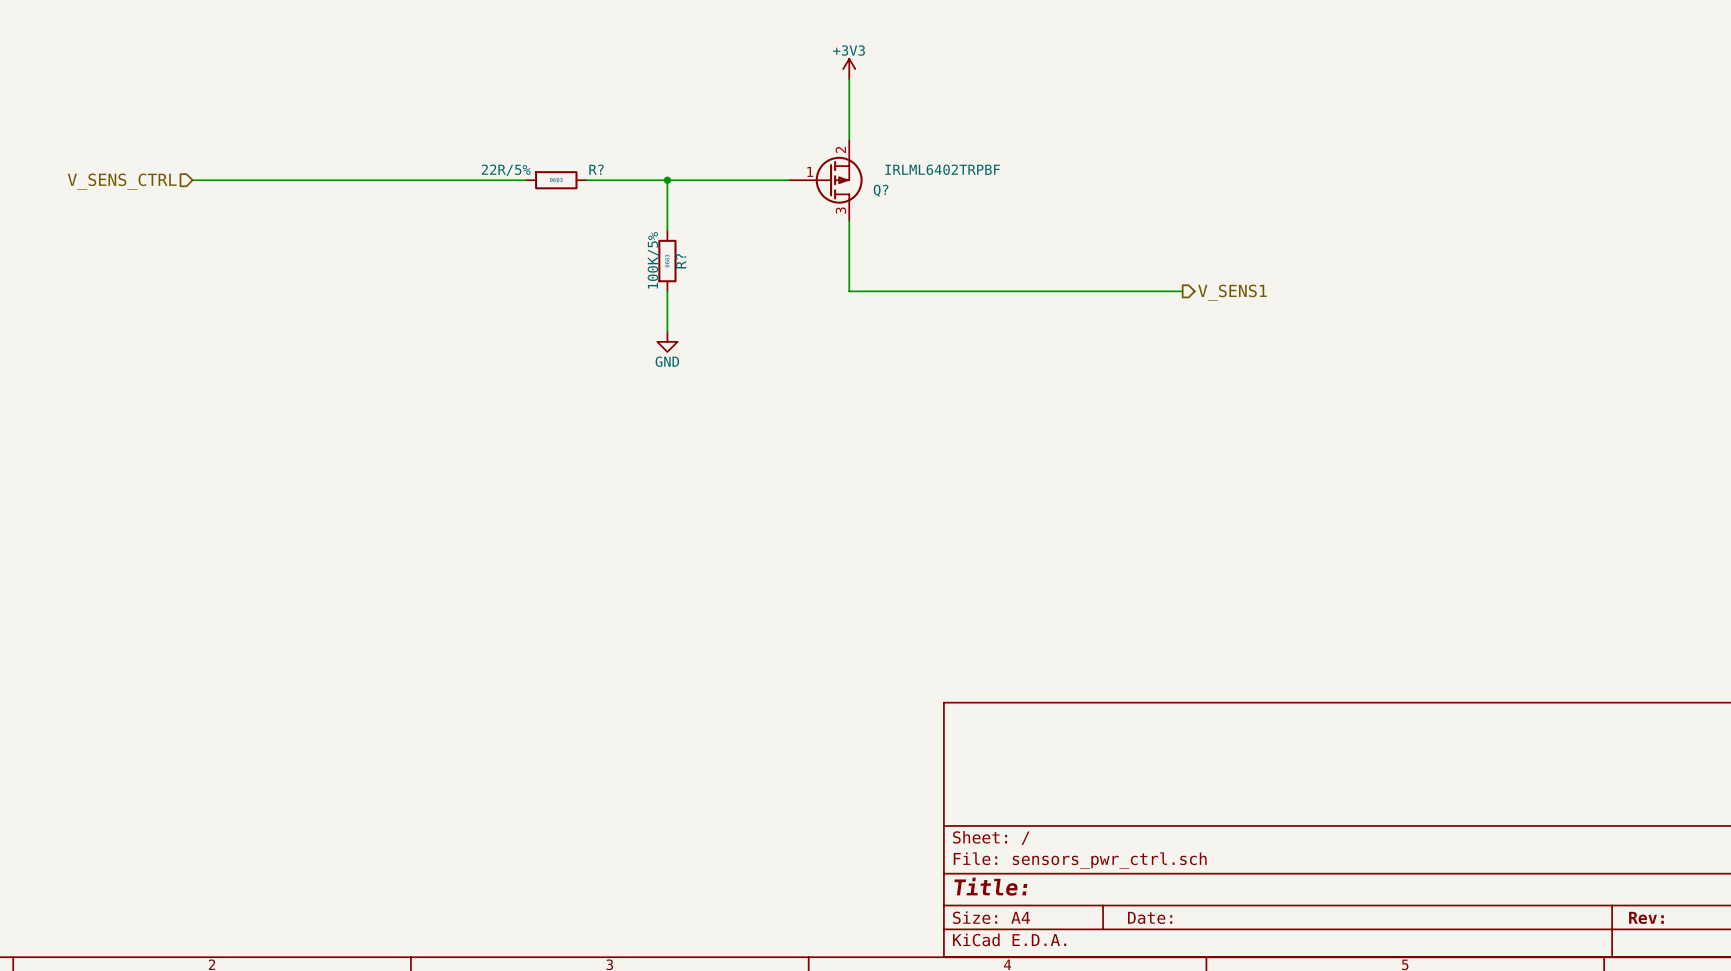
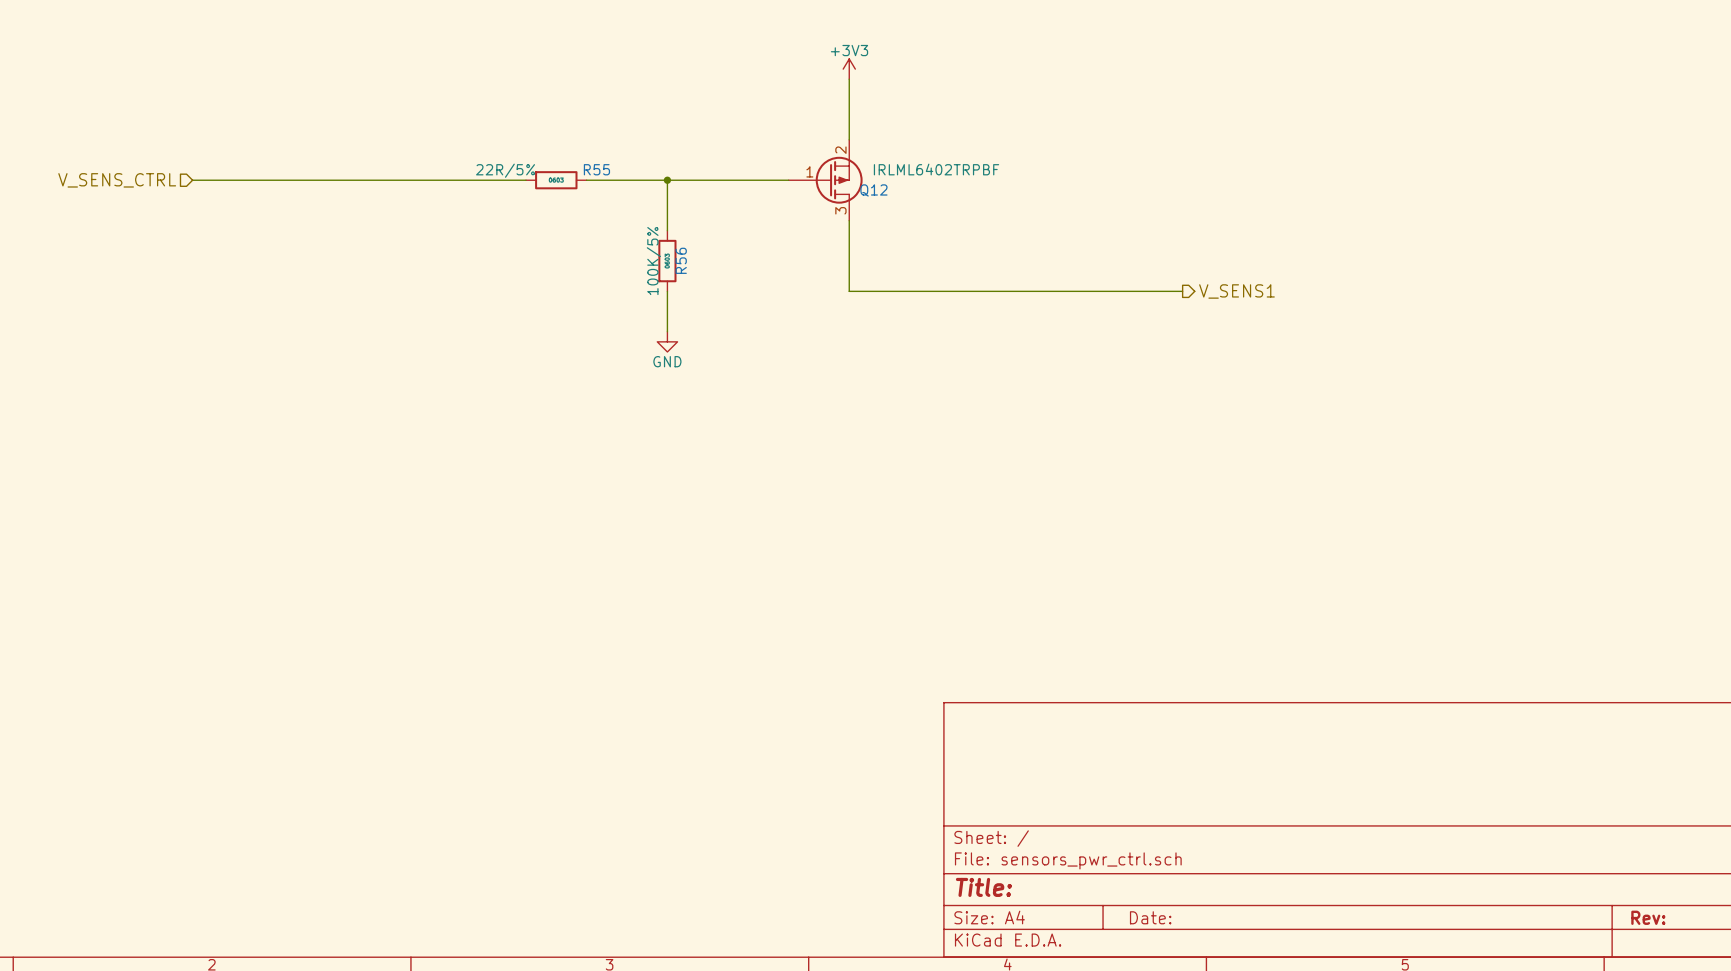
R? name: R? (596, 169) -> R55 (596, 169)
Q? name: Q? (881, 190) -> Q12 (873, 190)
R? name: R? (681, 261) -> R56 (681, 260)

